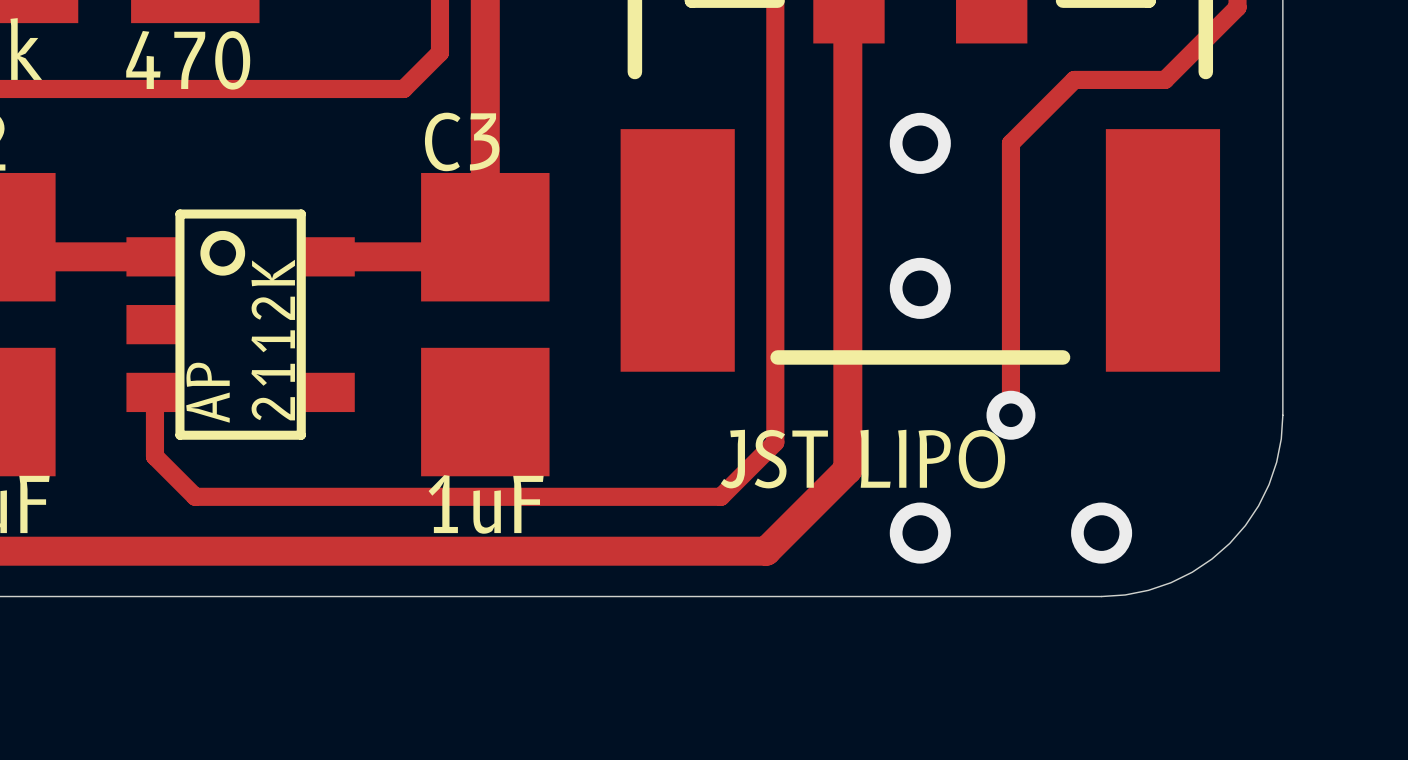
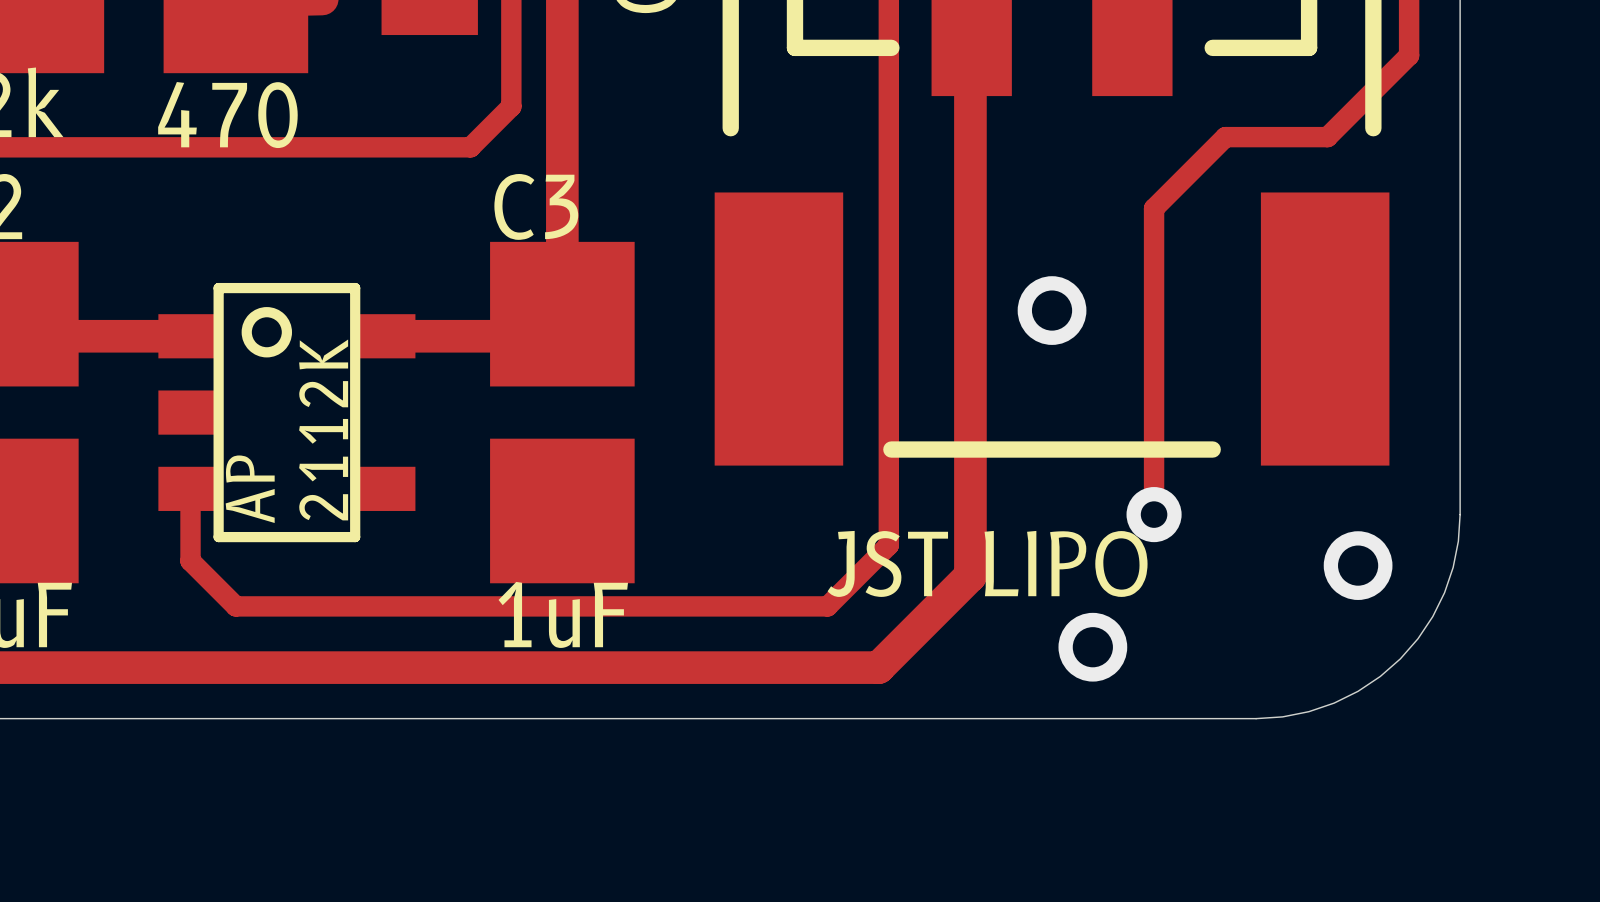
via: (920, 143) -> none
via position: (920, 288) -> (1052, 310)
via: none -> (1358, 565)
via position: (920, 533) -> (1092, 647)
via: (1101, 533) -> none

